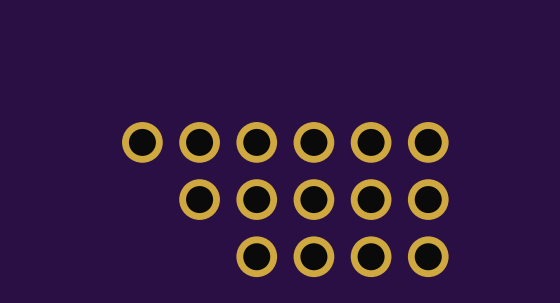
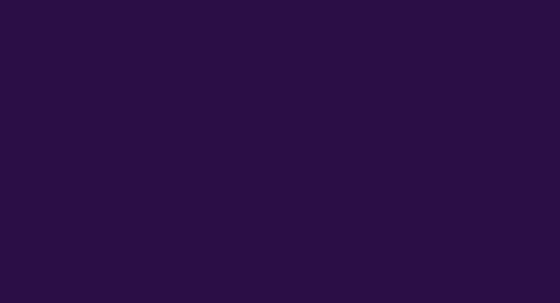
via: (142, 142) -> none
via: (199, 142) -> none
via: (256, 142) -> none
via: (313, 142) -> none
via: (371, 142) -> none
via: (428, 142) -> none
via: (199, 199) -> none
via: (256, 199) -> none
via: (313, 199) -> none
via: (371, 199) -> none
via: (428, 199) -> none
via: (256, 256) -> none
via: (313, 256) -> none
via: (371, 256) -> none
via: (428, 256) -> none

